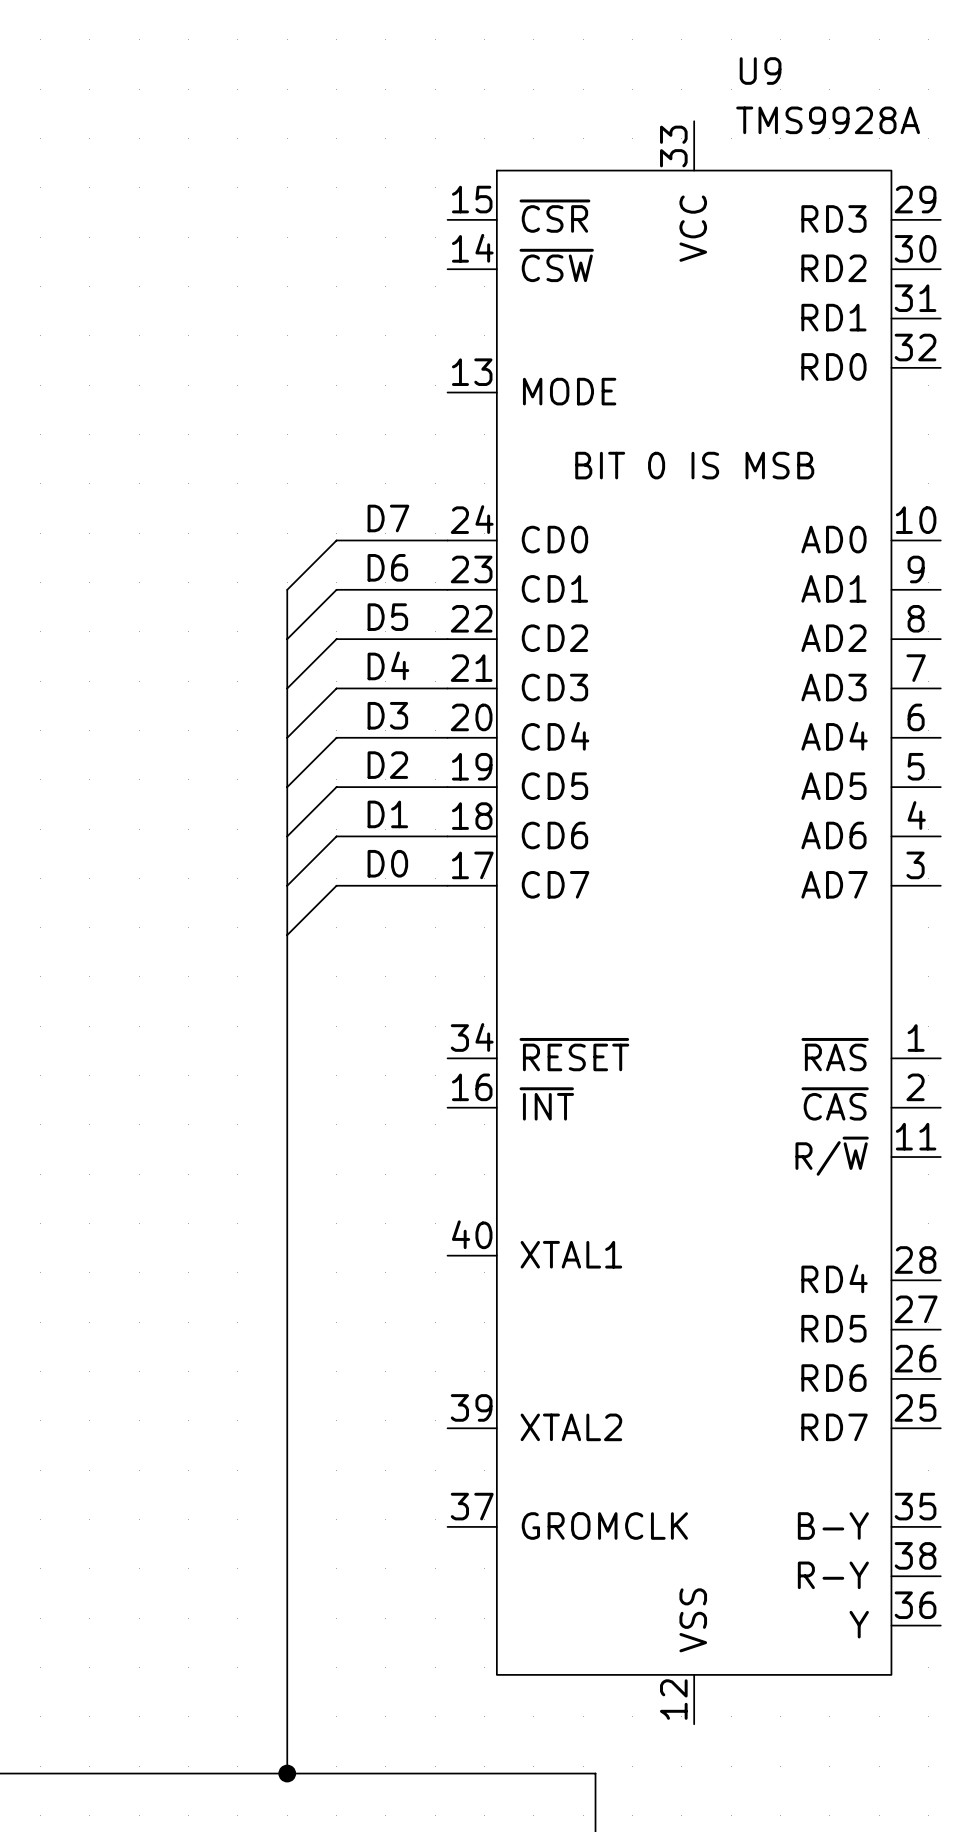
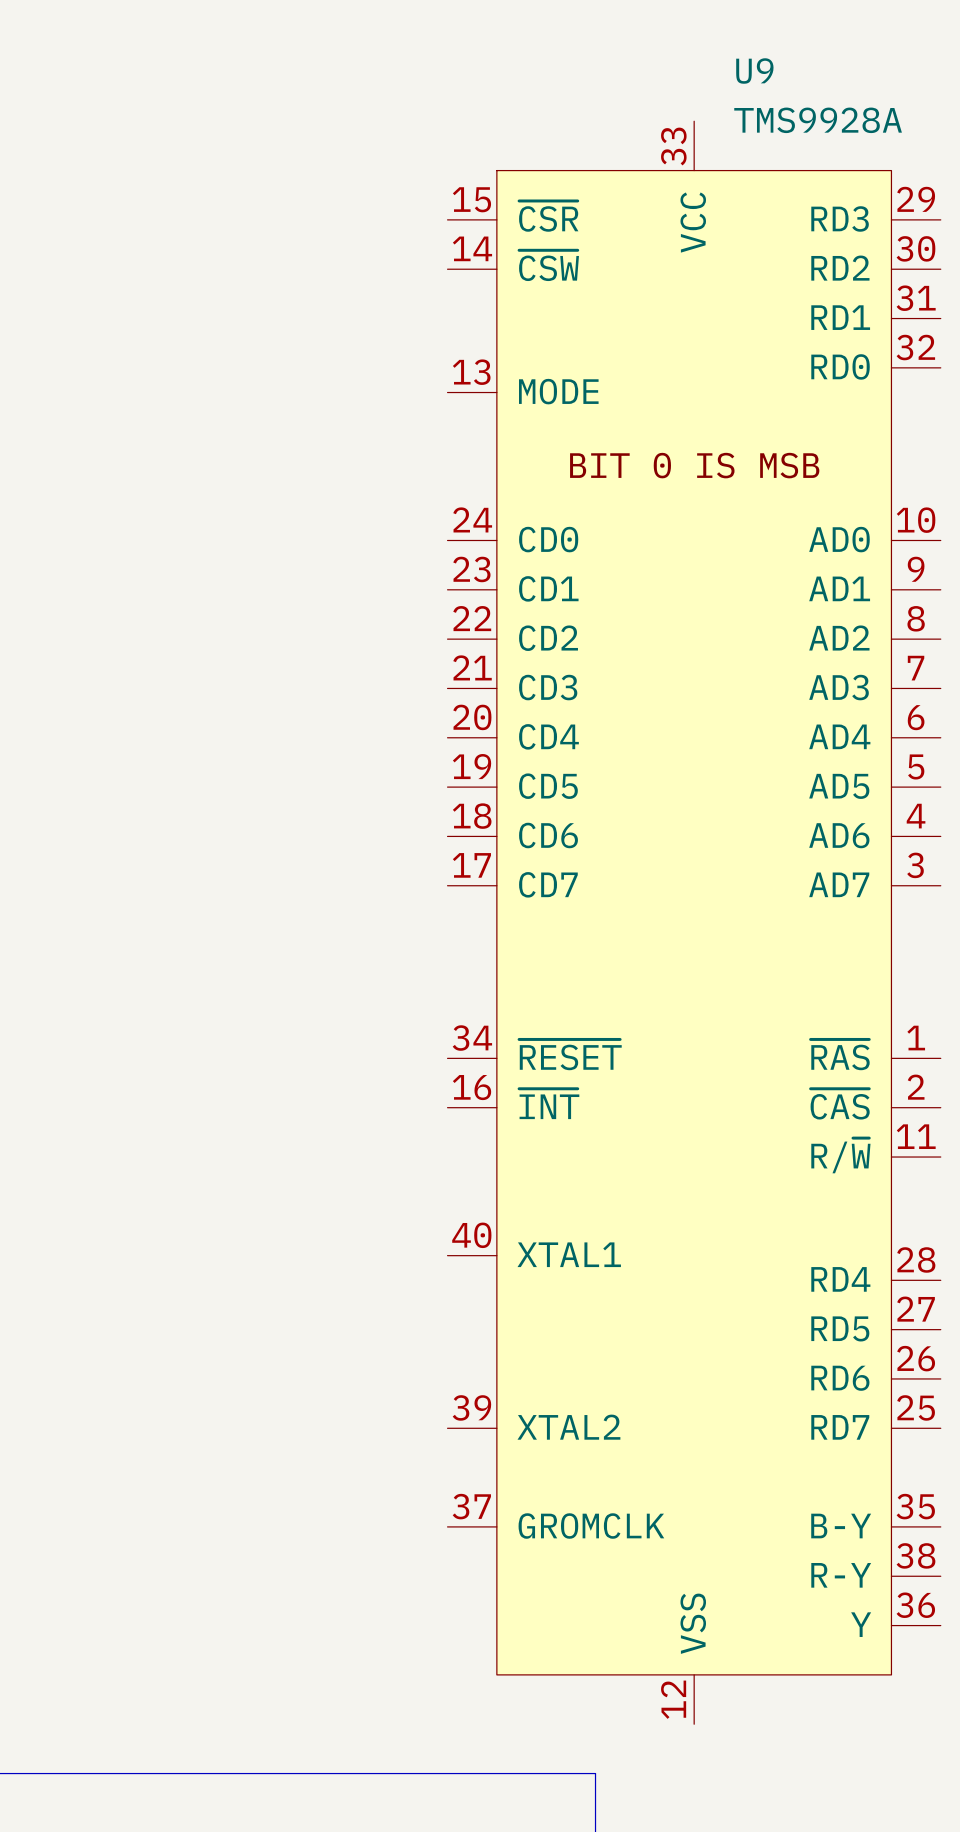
label: D7 (388, 518) -> none
wire: (447, 540) (336, 540) (287, 589) -> none
label: D6 (387, 567) -> none
bus: (287, 589) (287, 1773) -> none
wire: (447, 589) (336, 589) (287, 639) -> none
label: D5 (387, 617) -> none
wire: (447, 639) (336, 639) (287, 688) -> none
label: D4 (388, 665) -> none
wire: (447, 688) (336, 688) (287, 737) -> none
label: D3 (387, 715) -> none
wire: (447, 737) (336, 737) (287, 787) -> none
label: D2 (387, 765) -> none
wire: (447, 787) (336, 787) (287, 836) -> none
label: D1 (387, 814) -> none
wire: (447, 836) (336, 836) (287, 885) -> none
label: D0 (387, 863) -> none
wire: (447, 885) (336, 885) (287, 935) -> none
junction: (287, 1773) -> none

